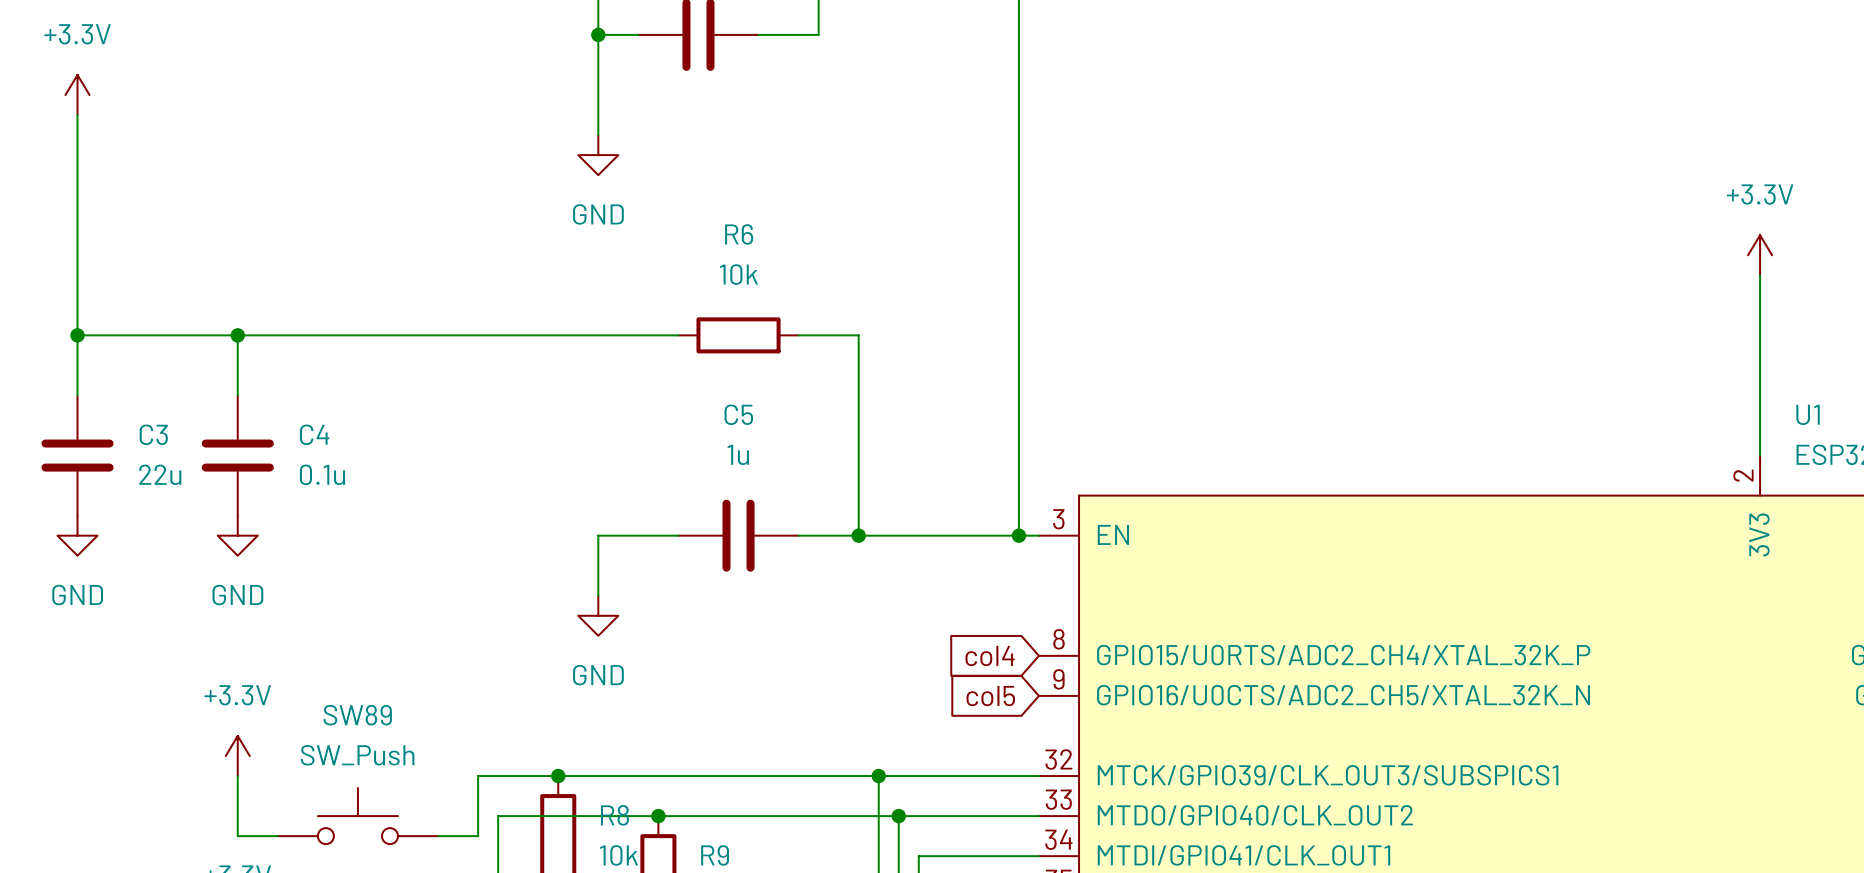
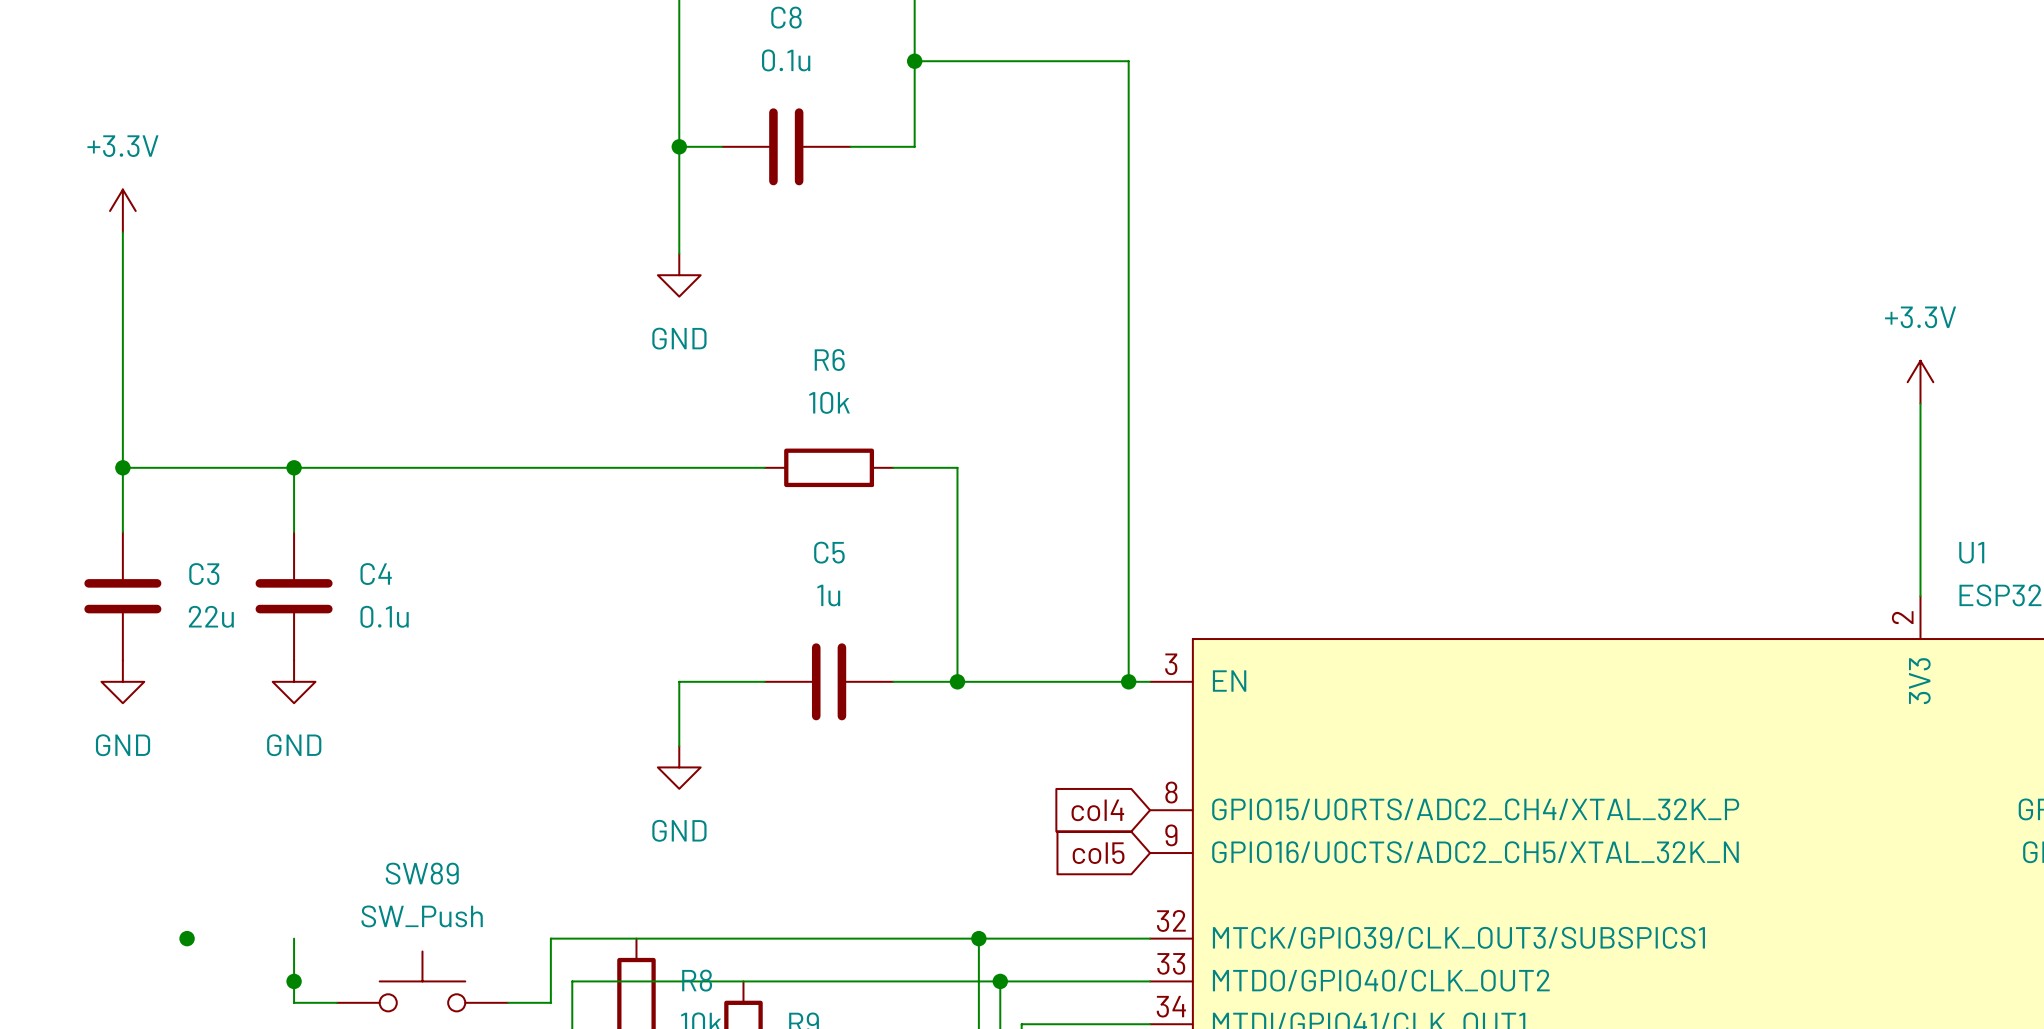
power symbol: +3.3V (237, 756) -> none
junction: none -> (187, 938)
junction: (558, 776) -> none
junction: none -> (294, 981)
junction: (658, 816) -> none

